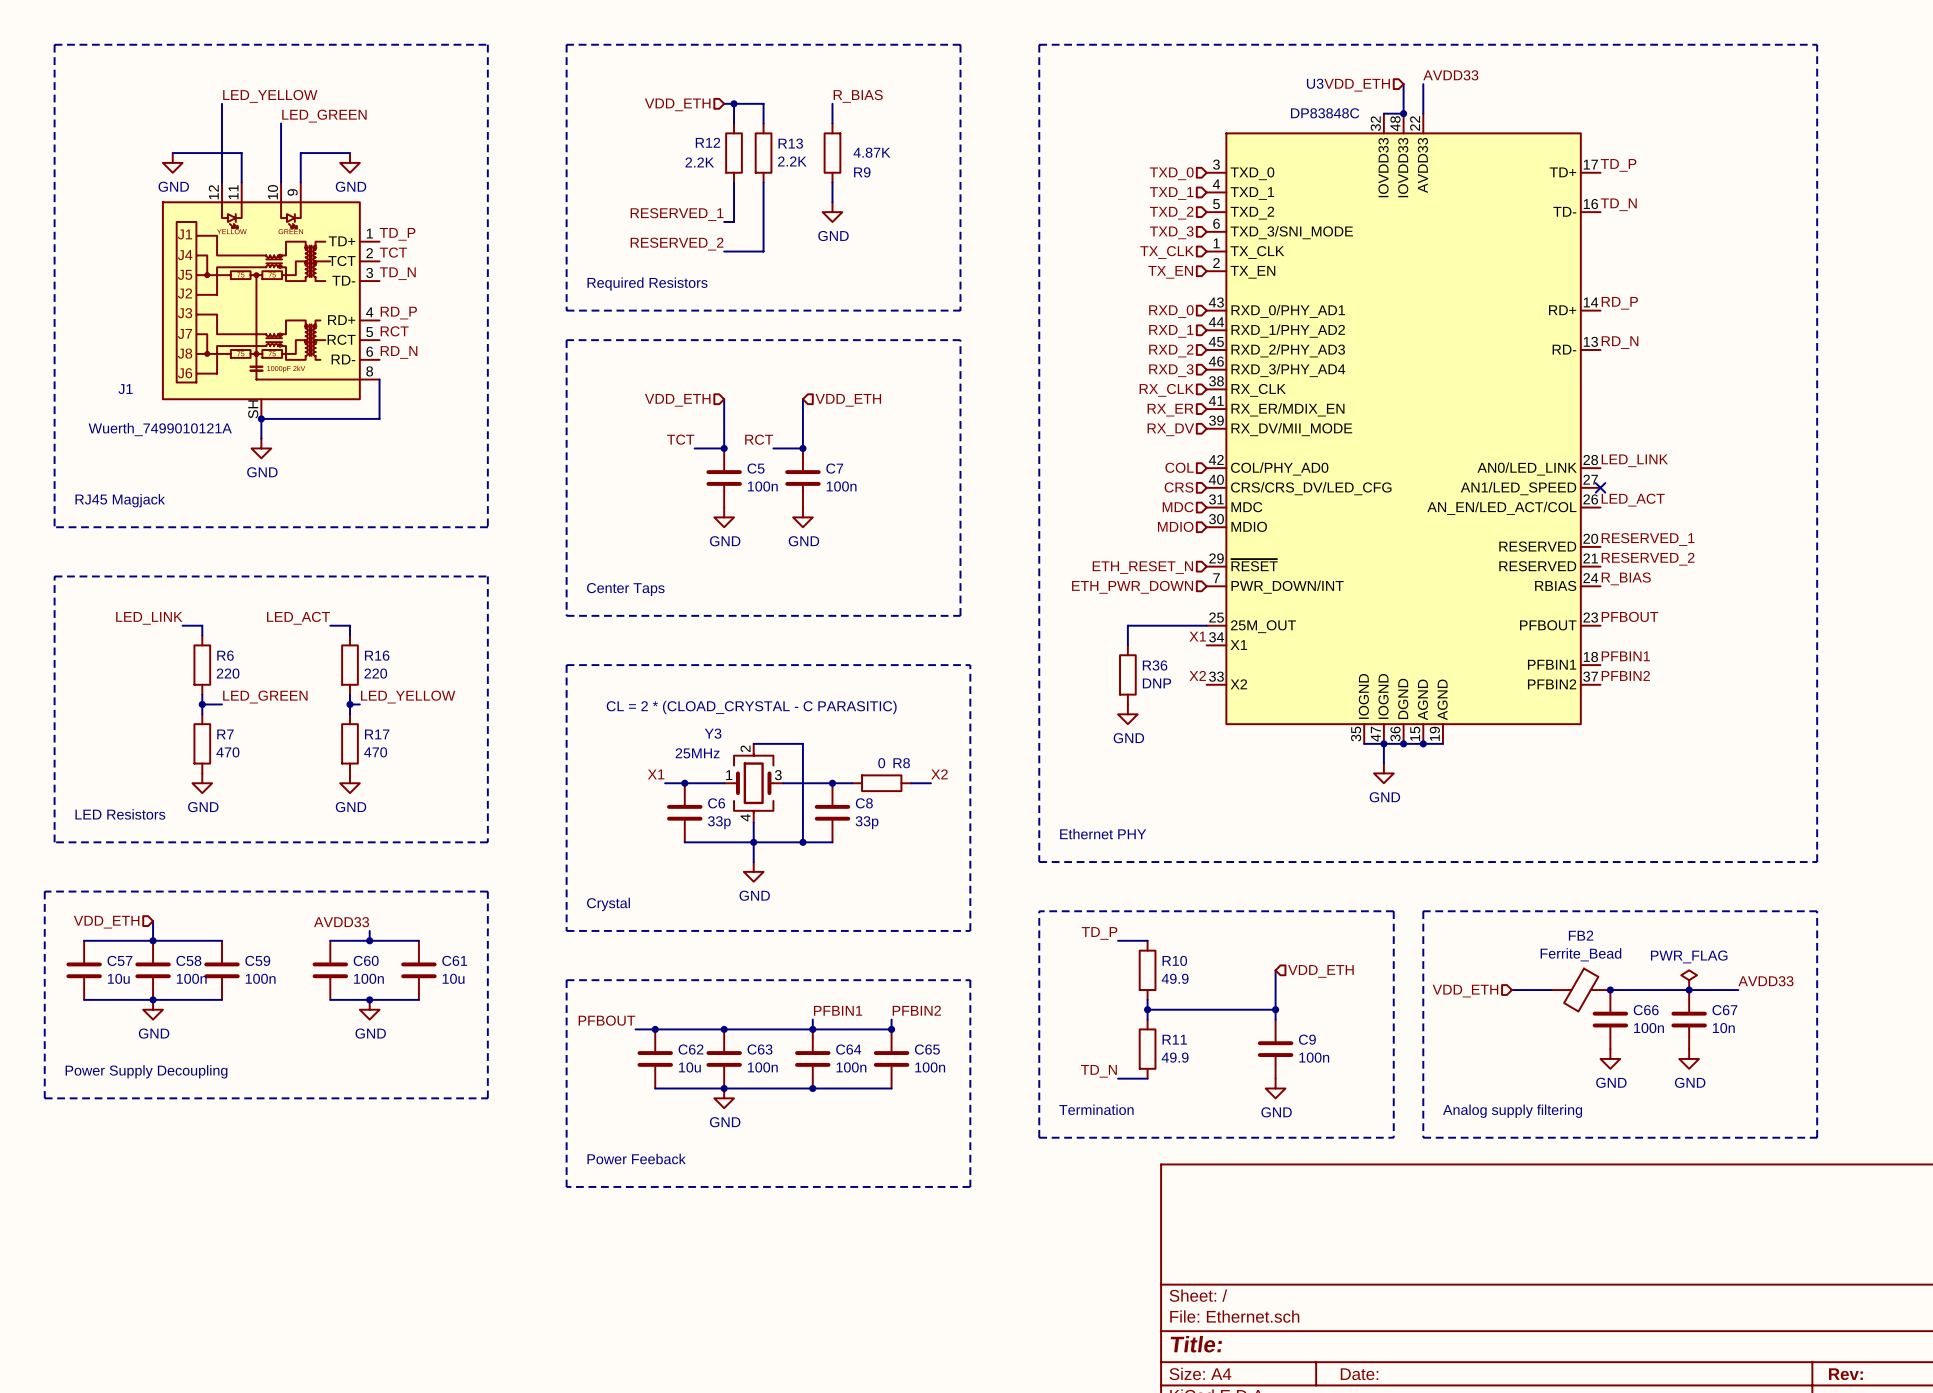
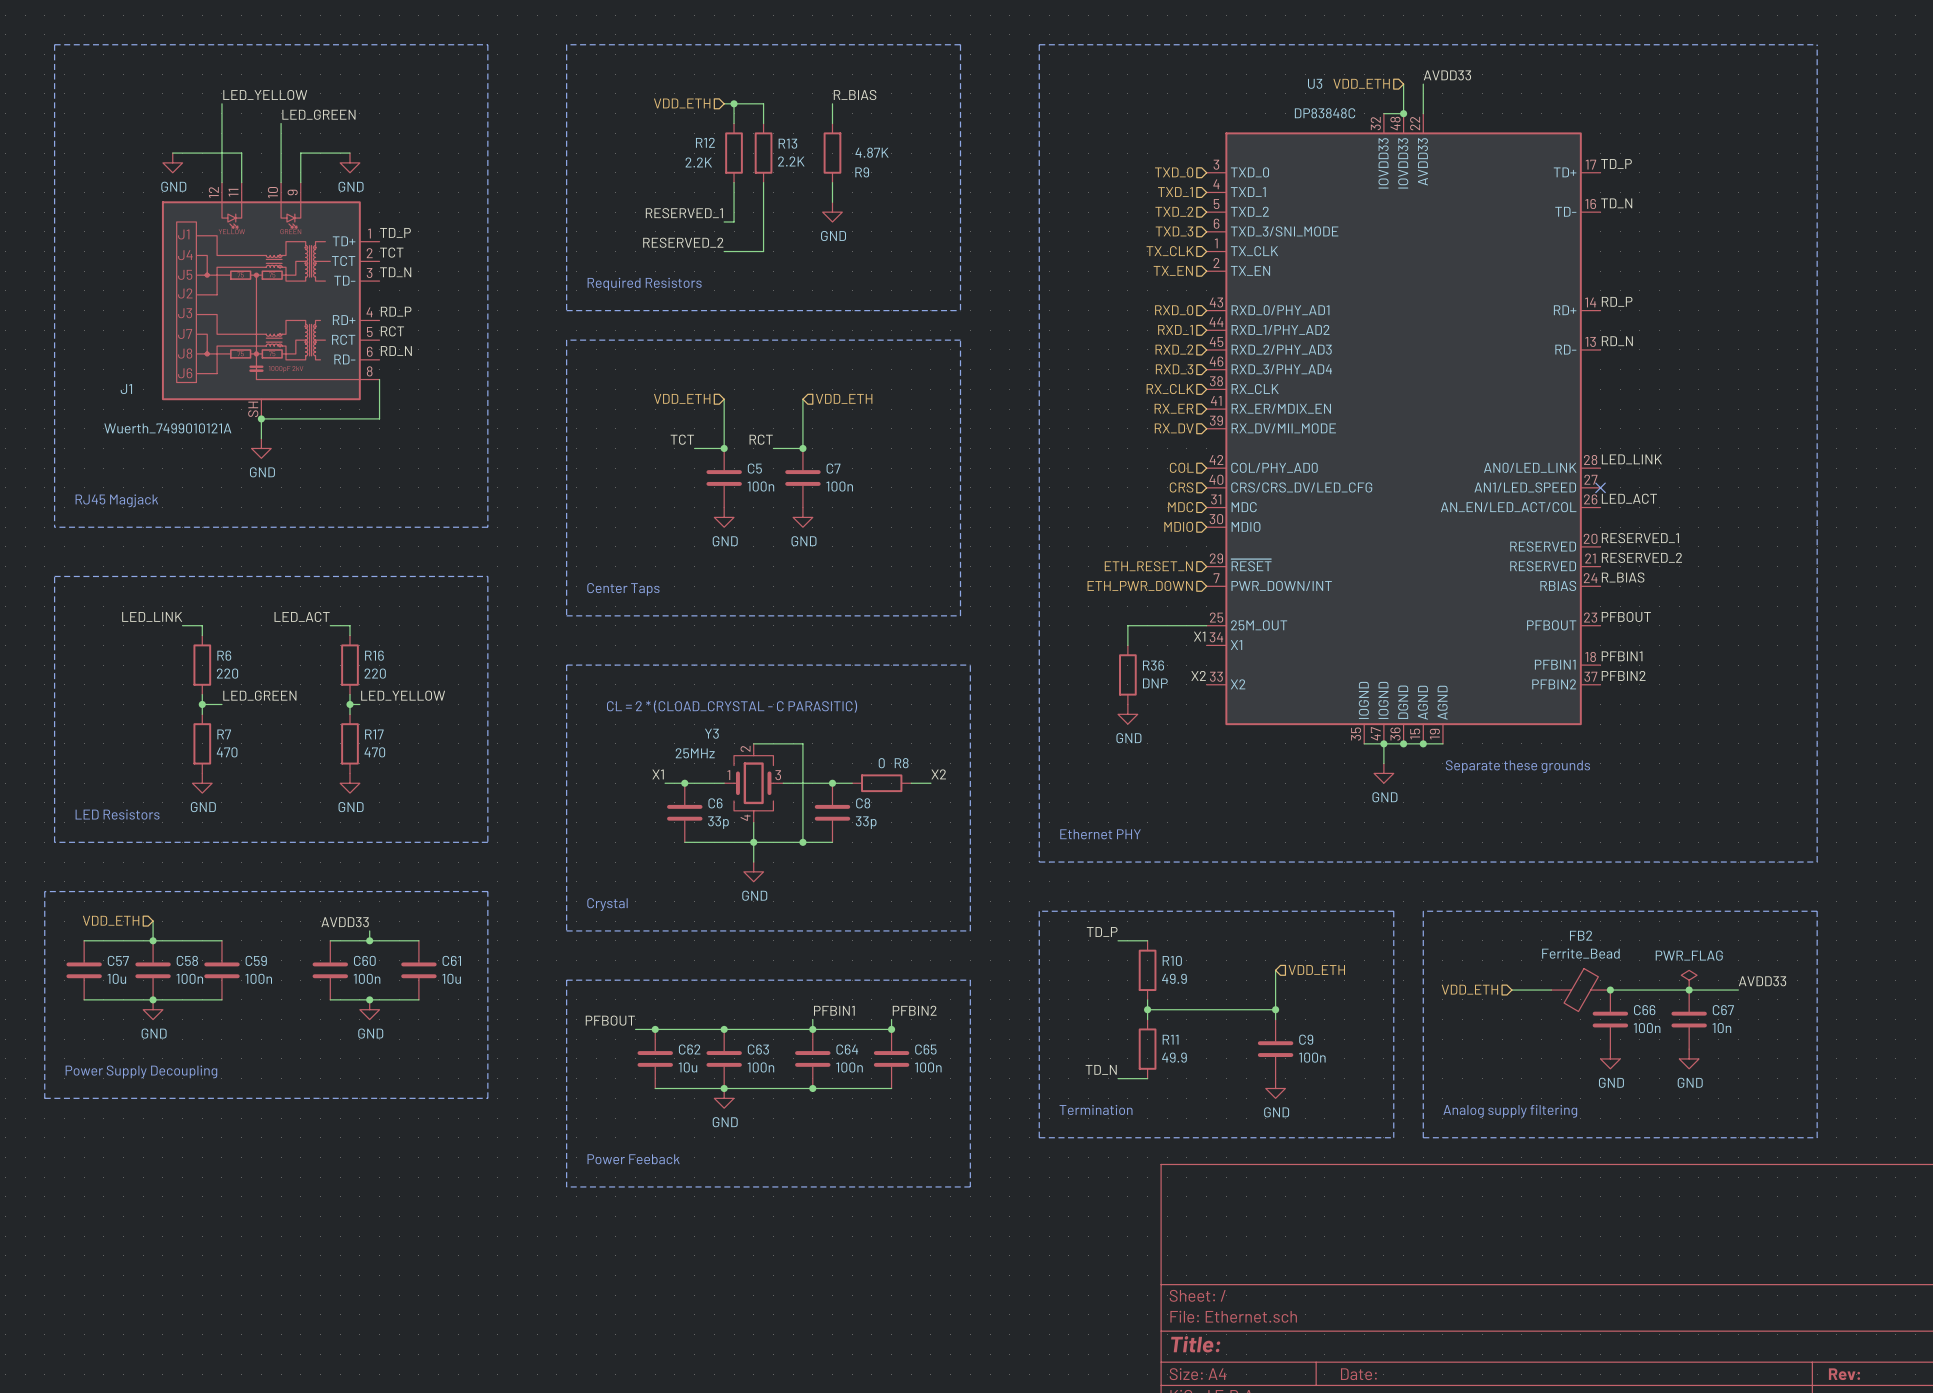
text: none -> Separate these grounds (1517, 766)

